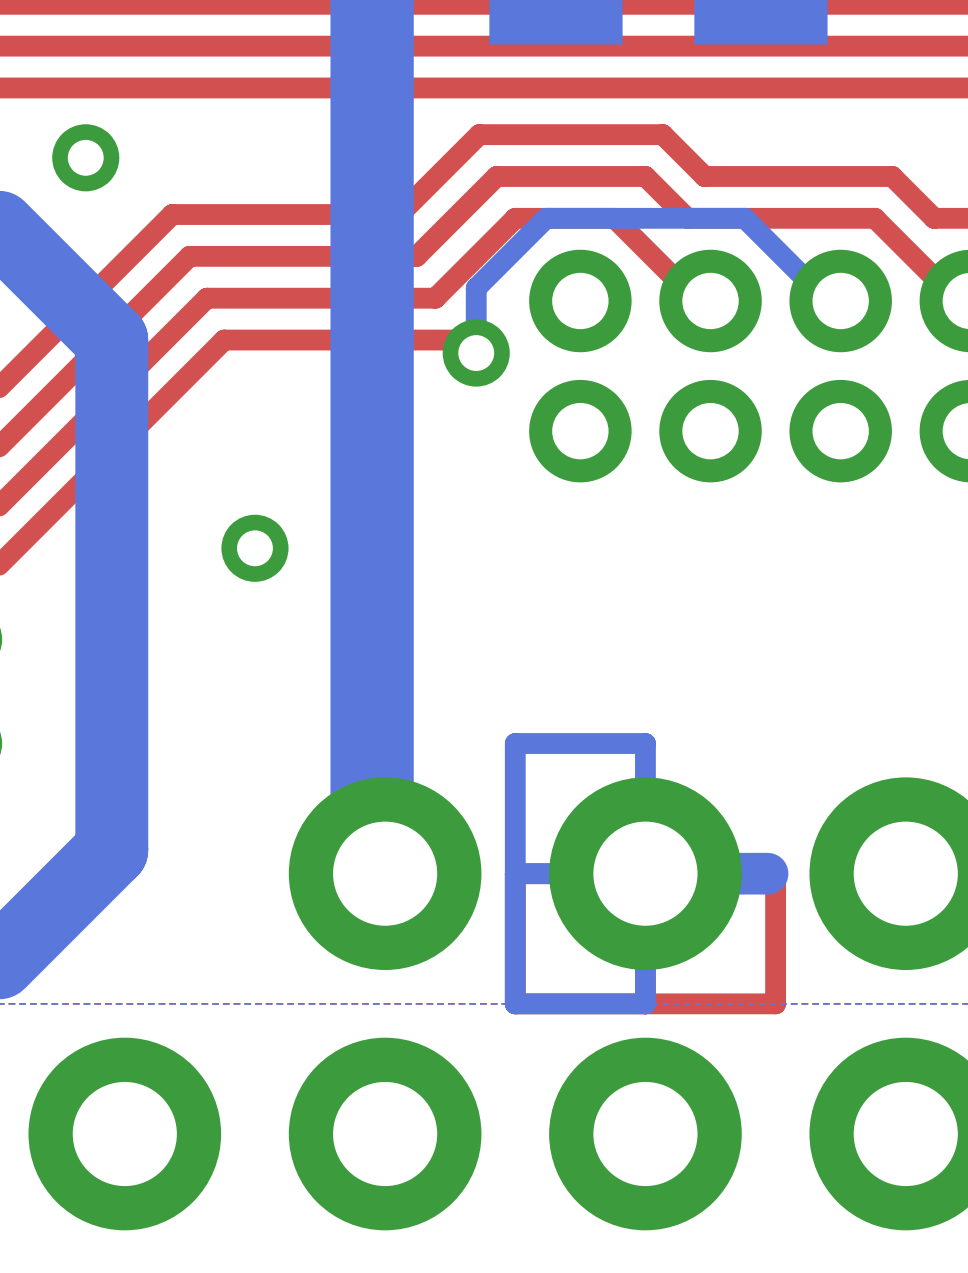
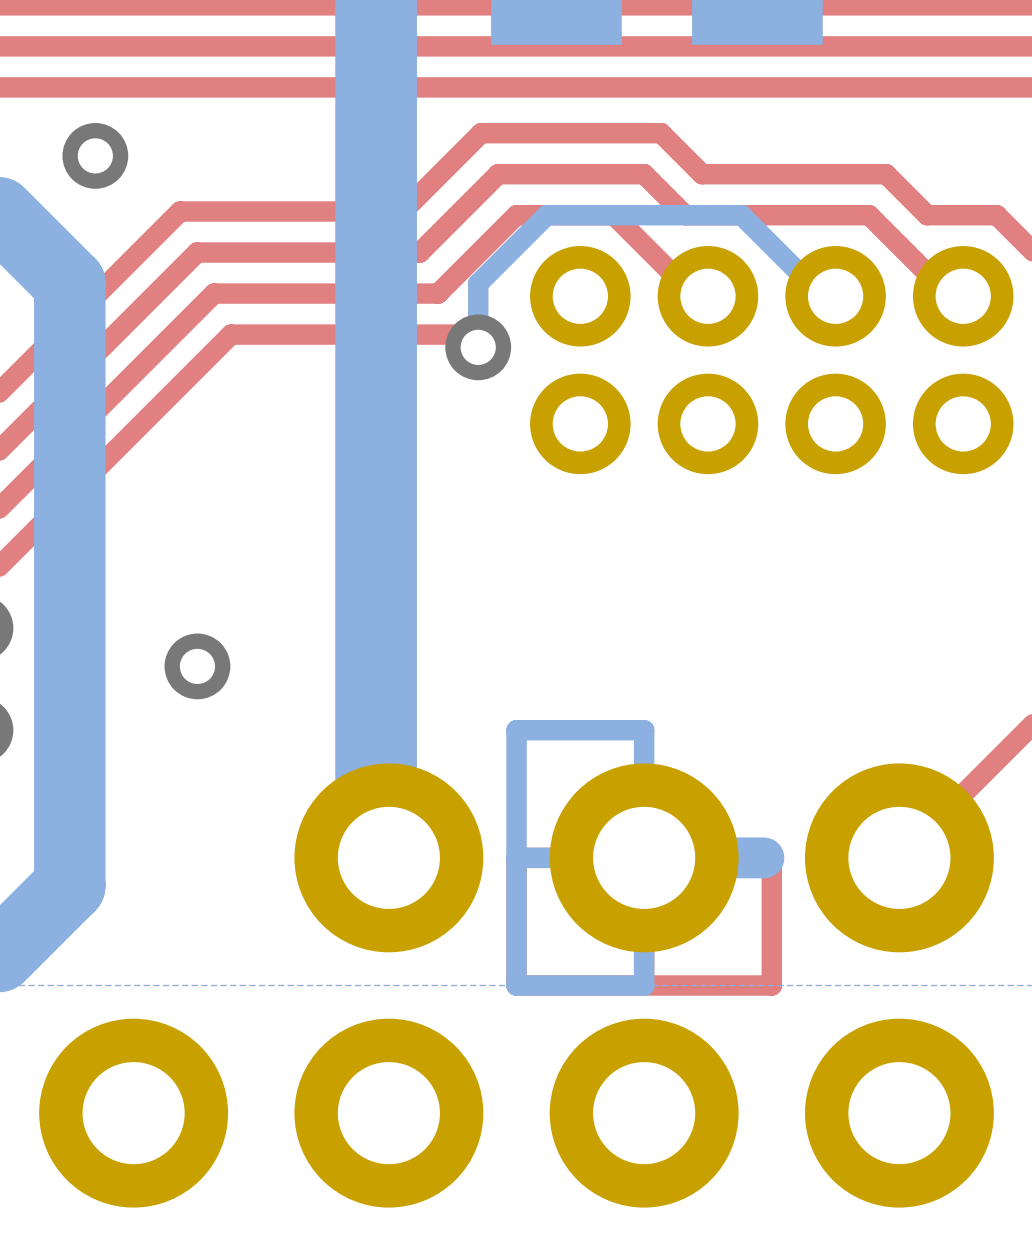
bottom track: (59, 287) (111, 340) (111, 850) (59, 902) -> (69, 283) (69, 885)
via position: (254, 548) -> (197, 666)

